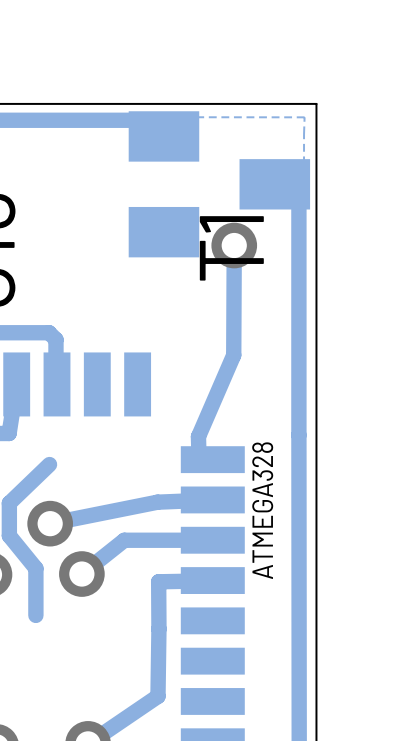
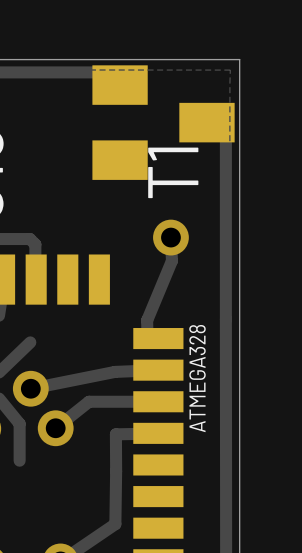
track: (234, 245) (233, 355) (198, 436) -> (170, 237) (171, 260) (147, 320)
via position: (234, 245) -> (170, 237)

